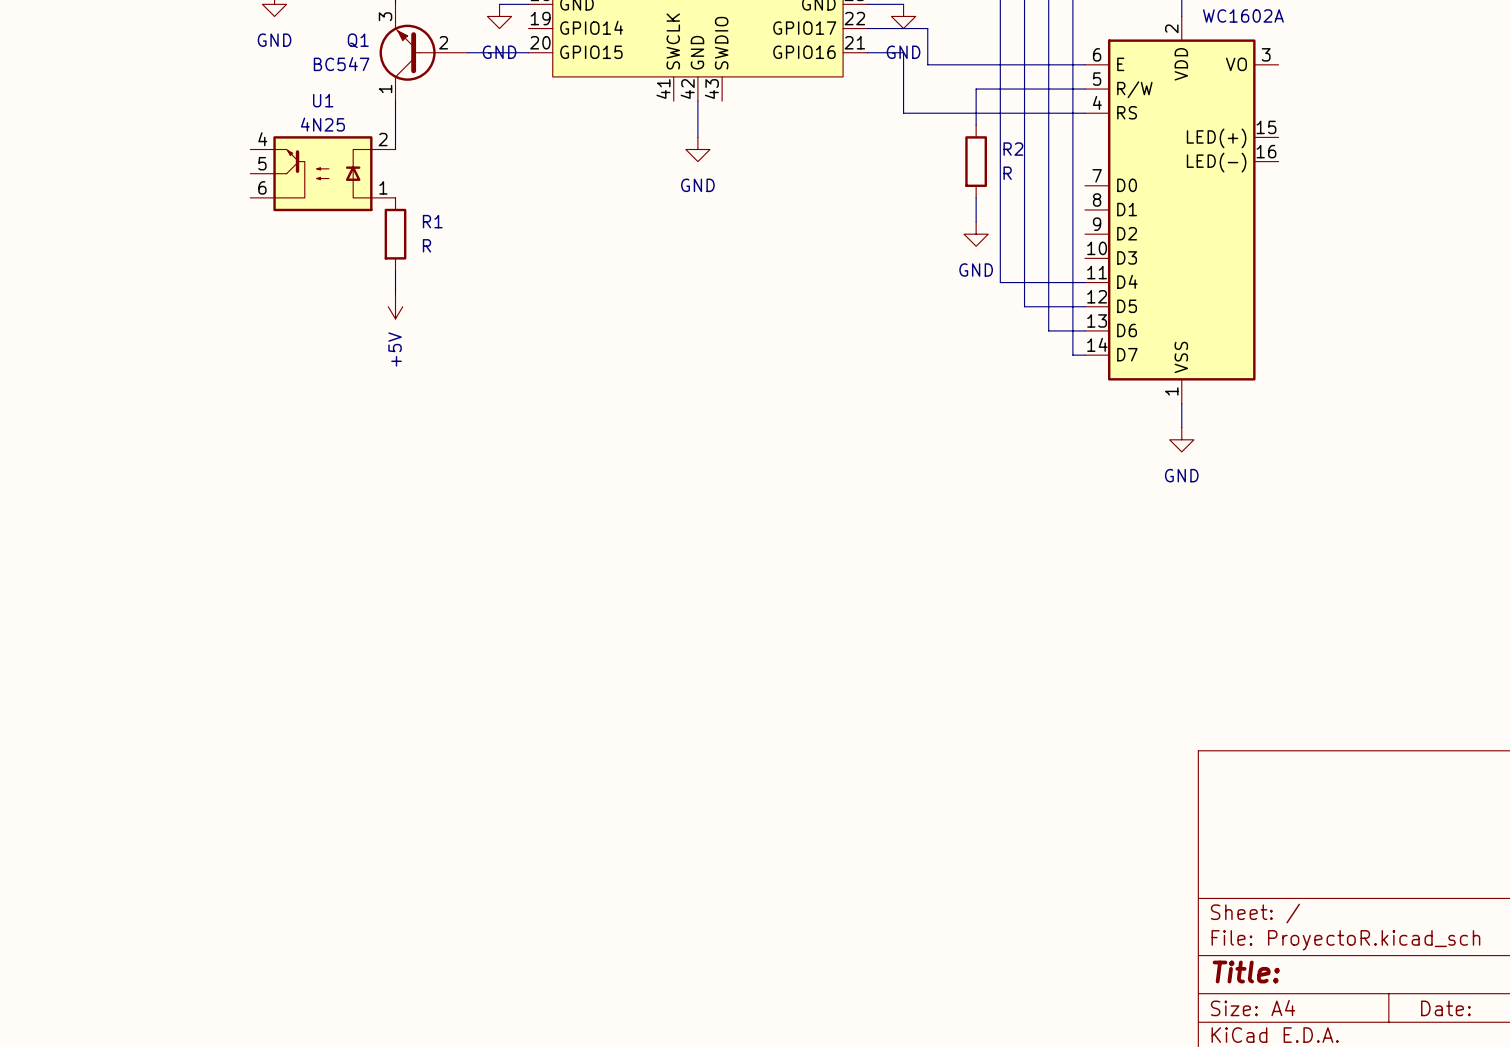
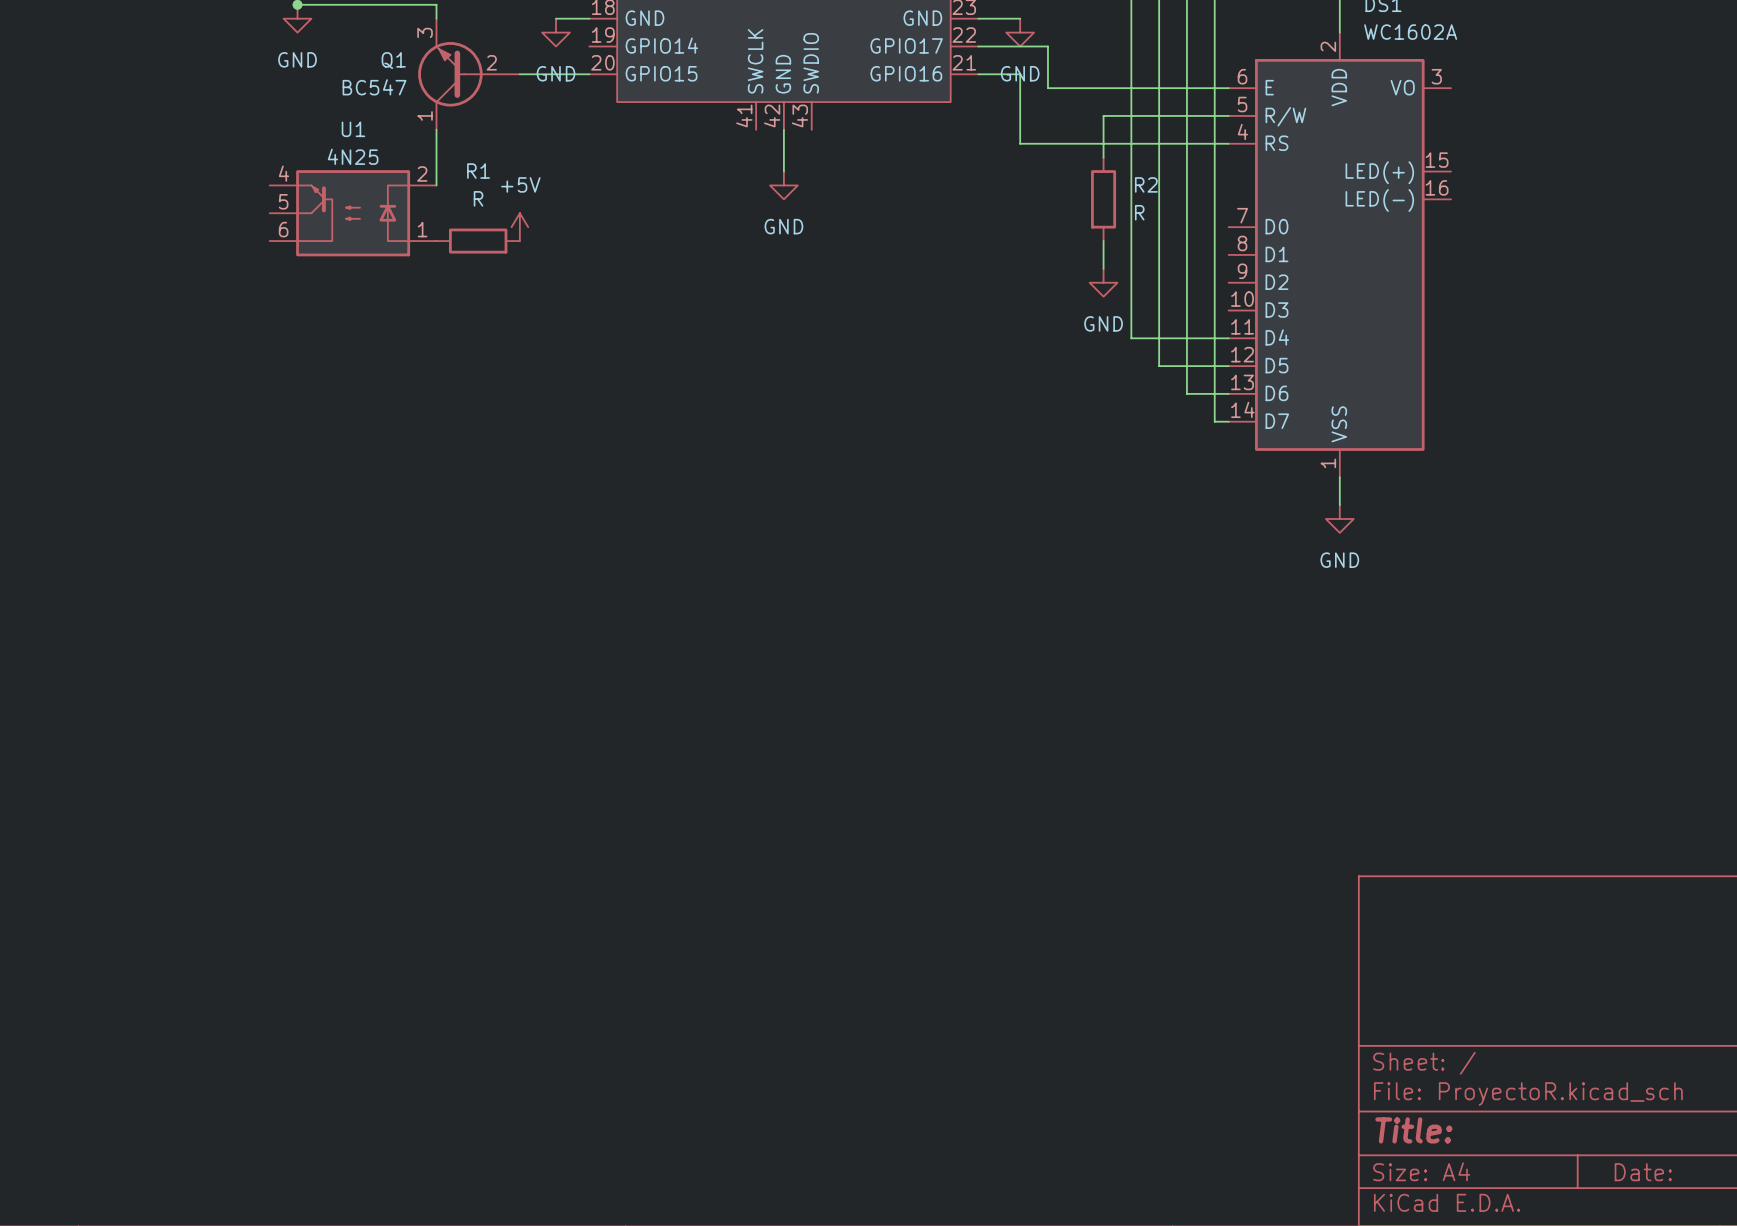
R1 name position: R1 (432, 221) -> R1 (478, 171)
R1 rotation: 0° (395, 234) -> 90° clockwise (478, 241)
R1 position: (395, 234) -> (478, 241)
R1 value position: R (426, 245) -> R (478, 198)
wire: (395, 270) (395, 294) -> none
power symbol rotation: 0° (395, 306) -> 180° (519, 227)
power symbol position: +5V (395, 306) -> +5V (519, 227)

